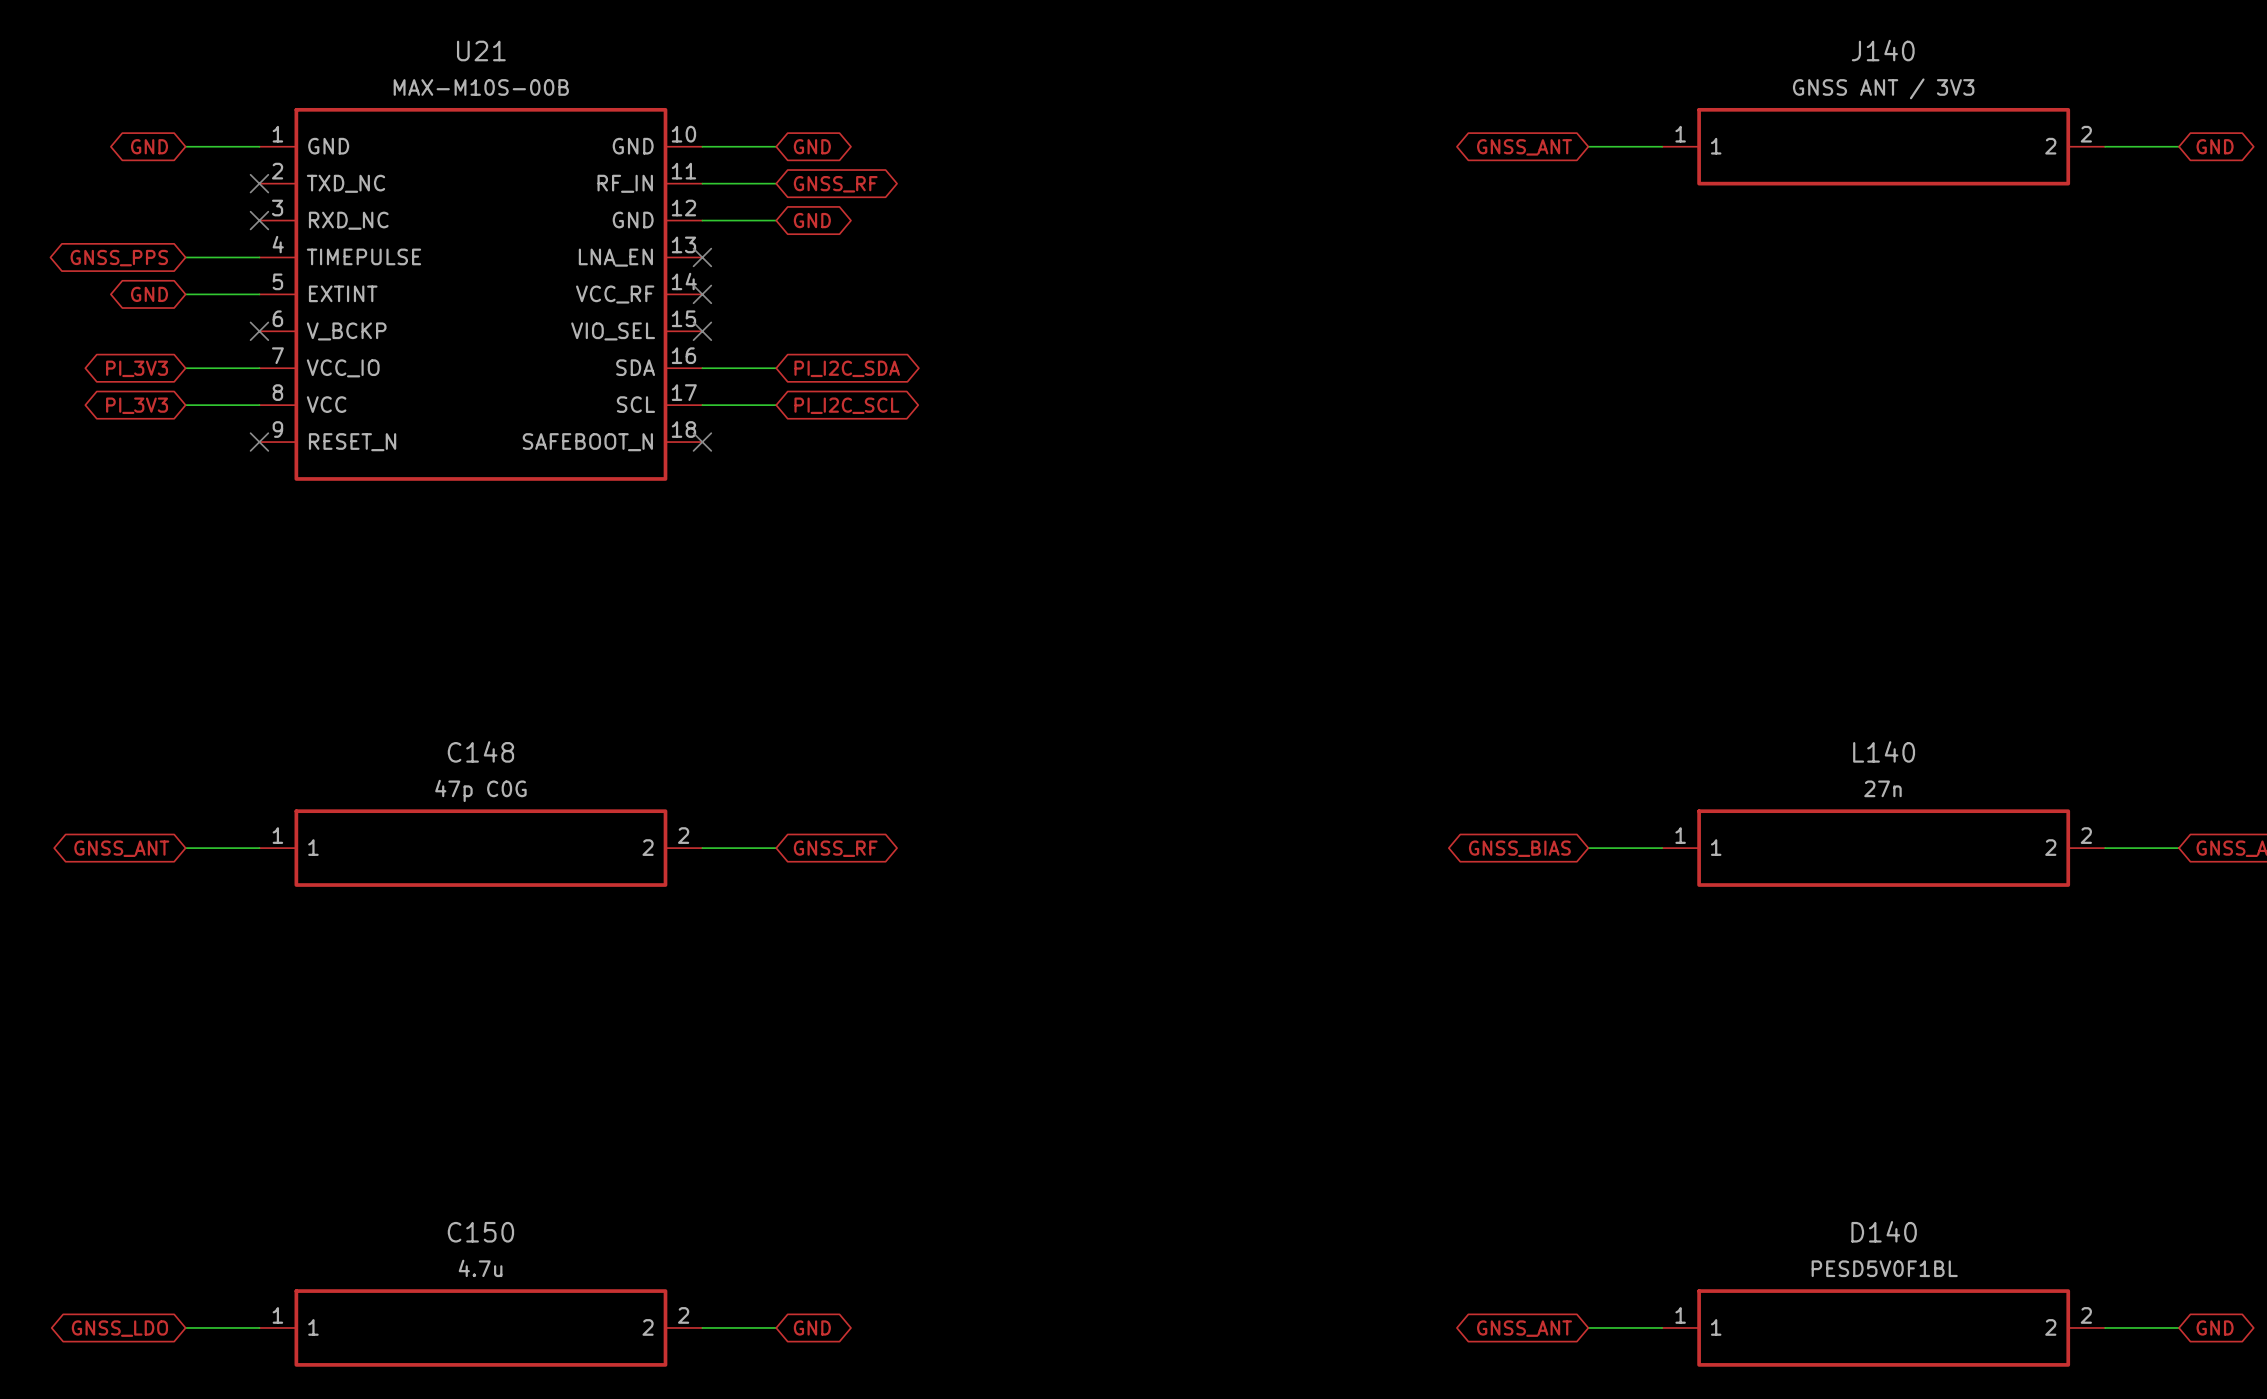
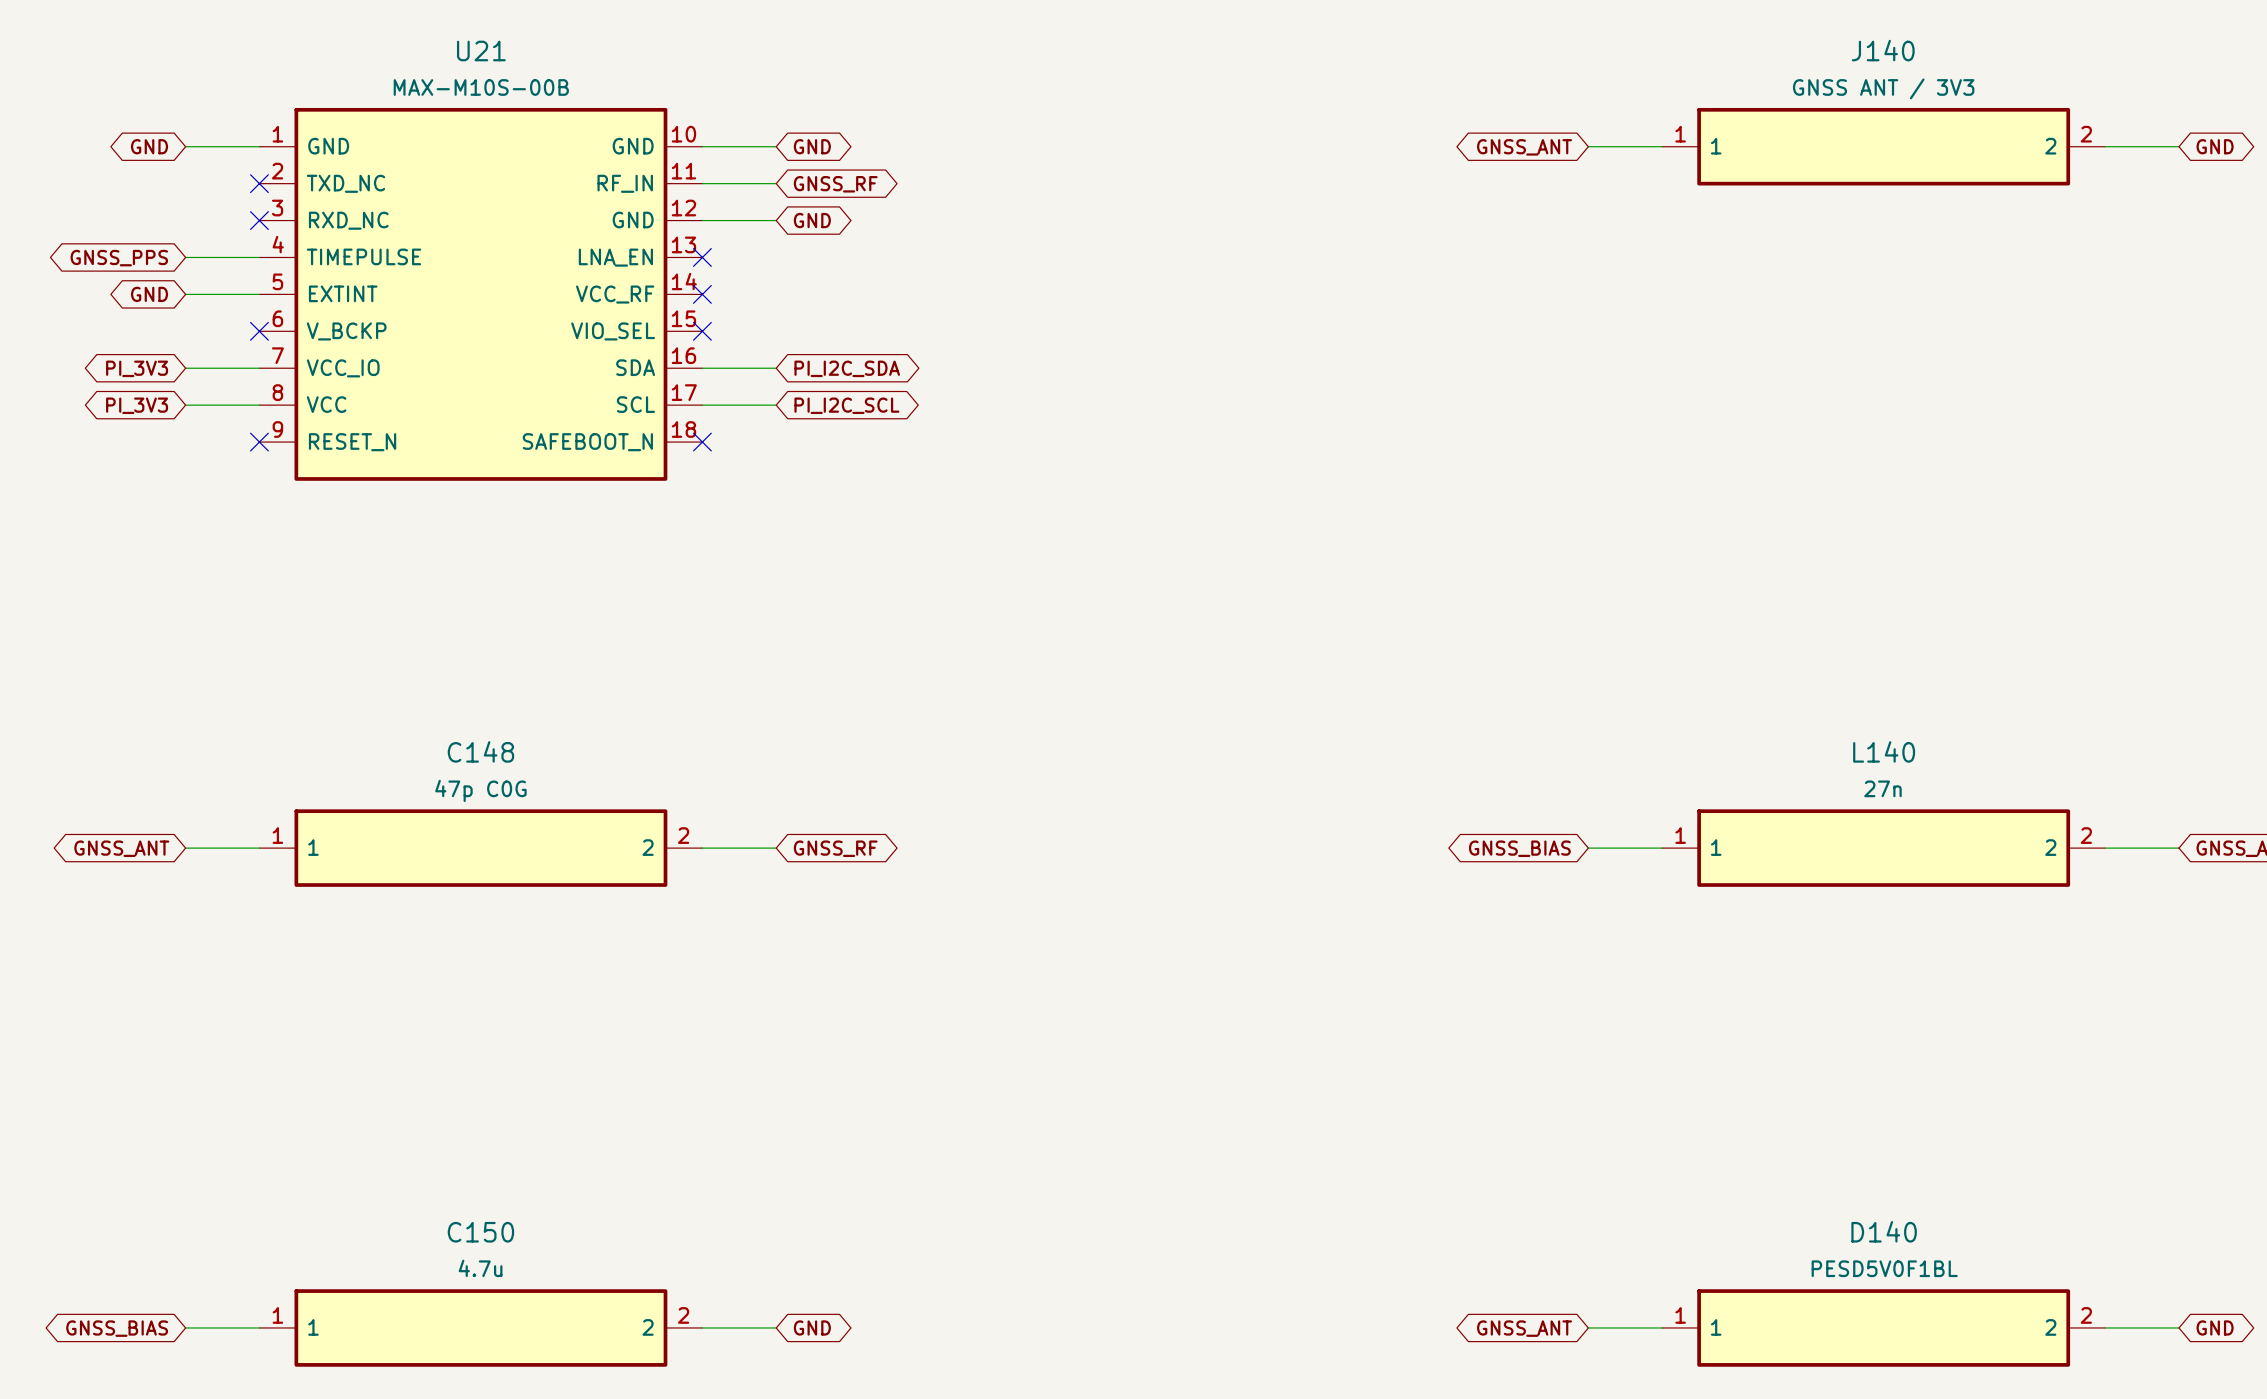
global label: GNSS_LDO (119, 1328) -> GNSS_BIAS (117, 1328)

